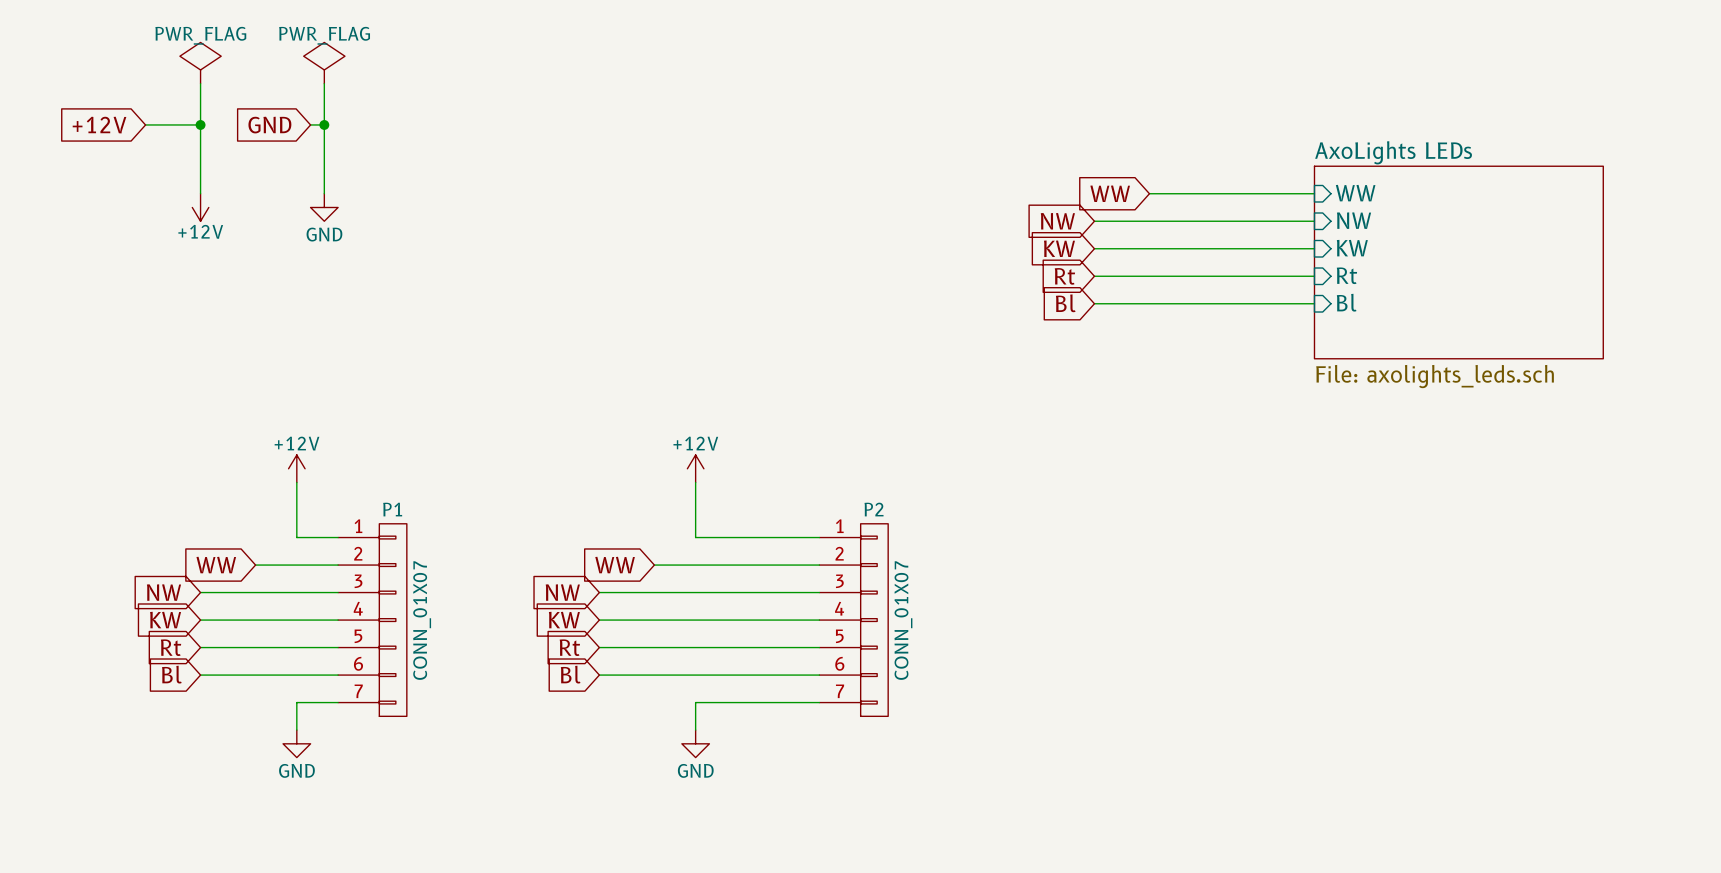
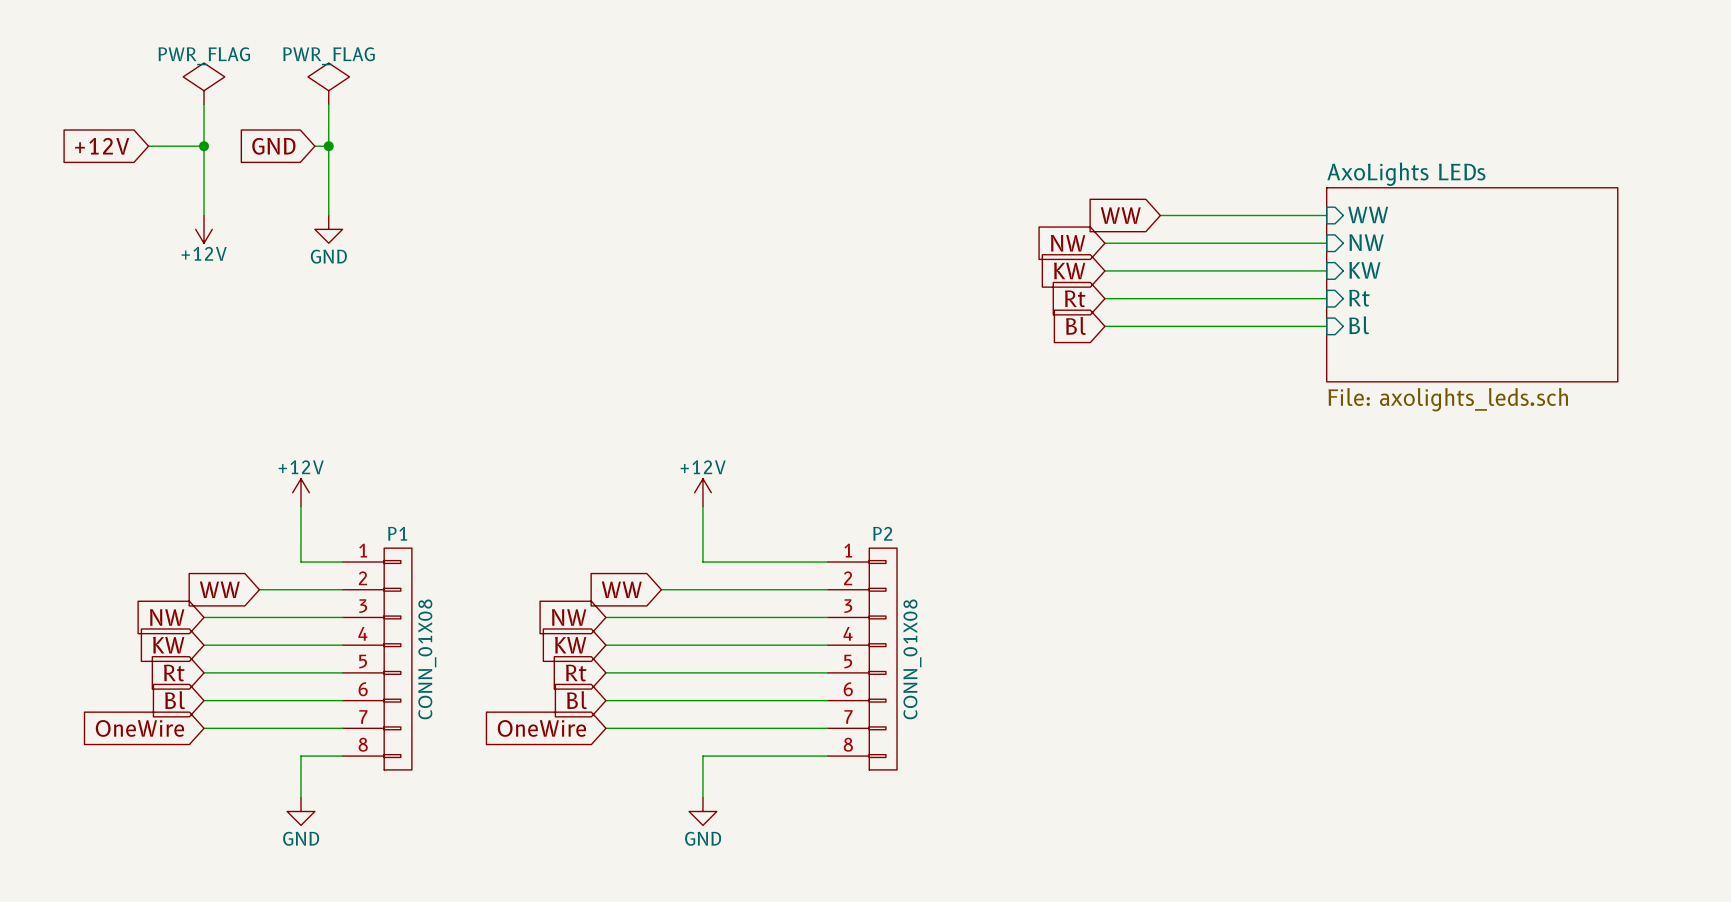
P1 symbol: [338, 523, 407, 717] -> [342, 548, 412, 770]
P2 symbol: [819, 523, 889, 717] -> [827, 548, 898, 770]
P1 value: CONN_01X07 (422, 620) -> CONN_01X08 (427, 659)
P2 value: CONN_01X07 (903, 620) -> CONN_01X08 (912, 659)
global label: none -> OneWire (139, 728)
wire: (296, 702) (296, 730) -> (301, 728) (203, 728)
global label: none -> OneWire (541, 728)
wire: (695, 702) (695, 730) -> (702, 728) (605, 728)
wire: none -> (342, 756) (301, 756) (301, 797)
wire: none -> (827, 756) (702, 756) (702, 797)
power symbol position: GND (296, 743) -> GND (301, 811)
power symbol position: GND (695, 743) -> GND (702, 811)

